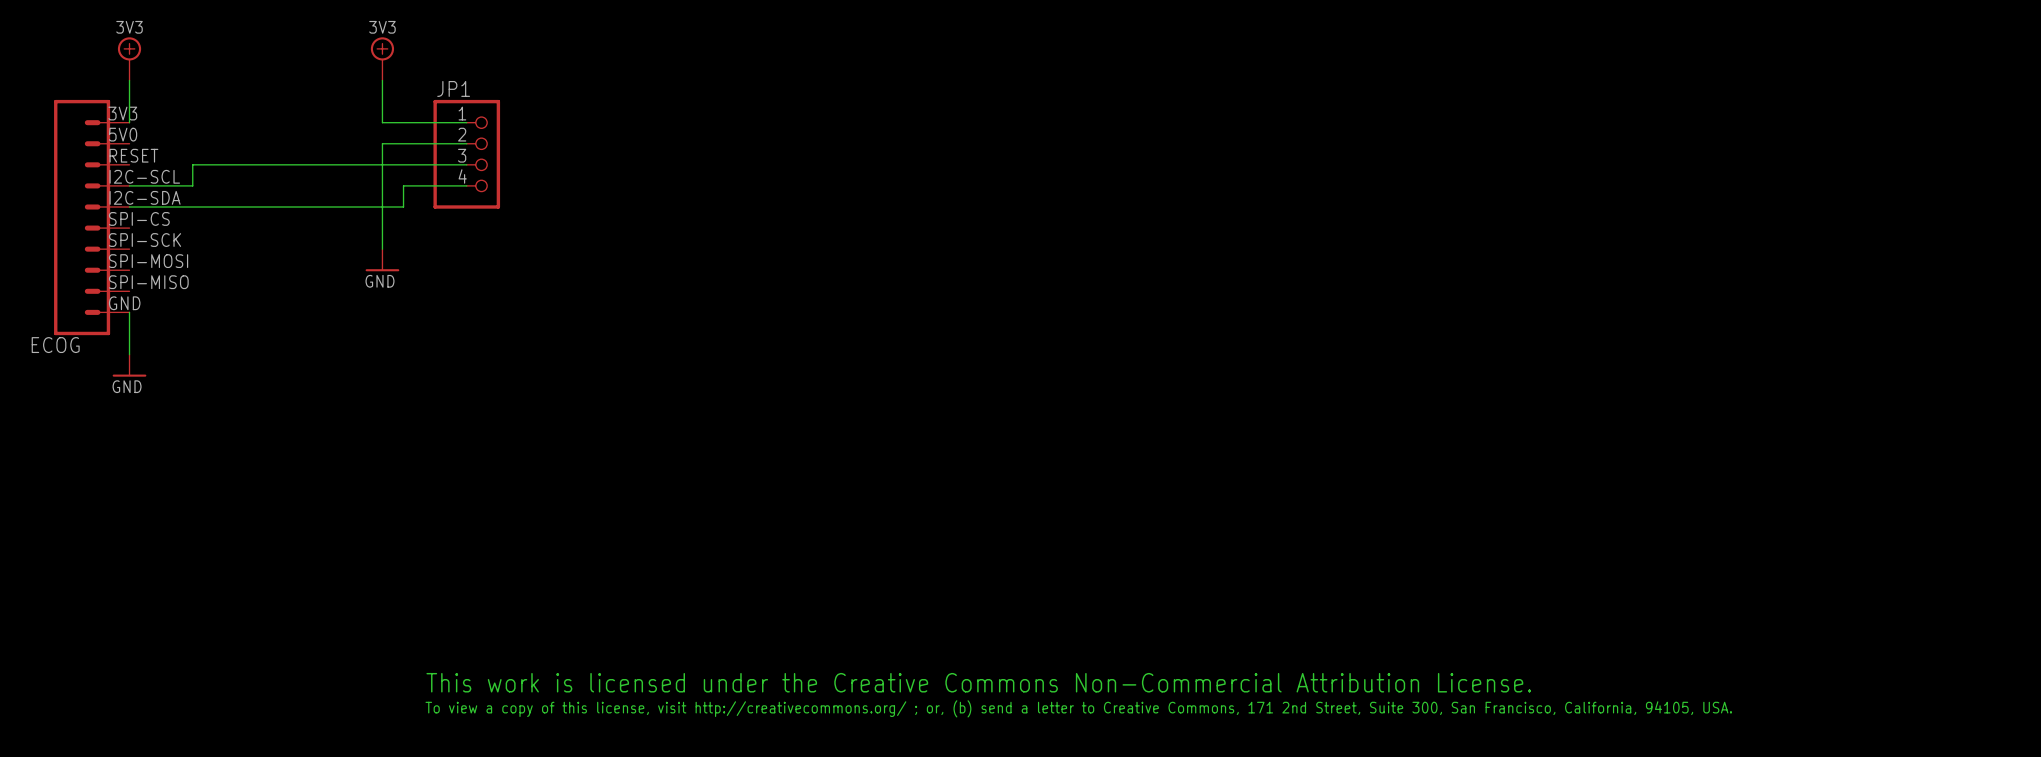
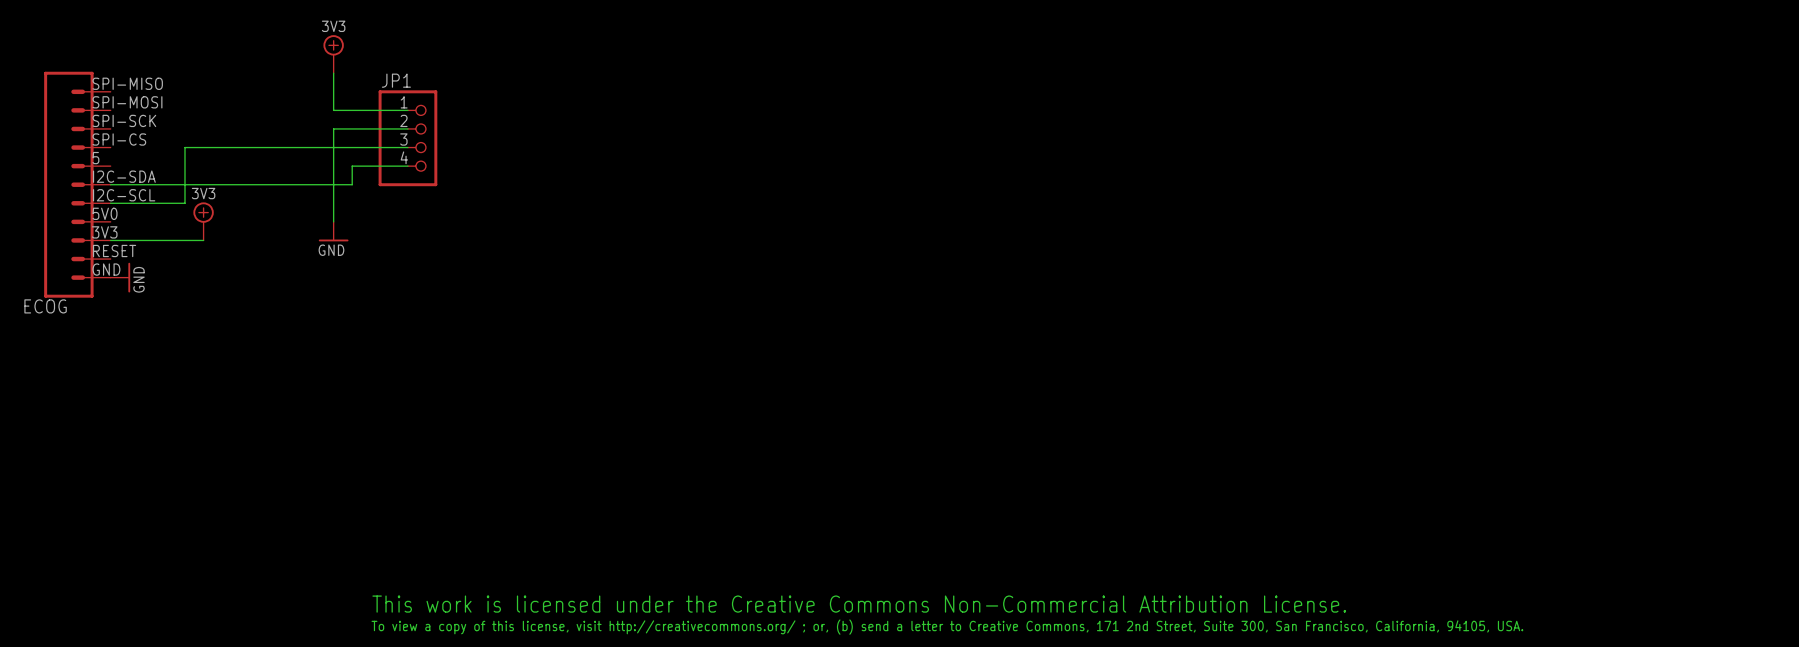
power symbol: 3V3 (129, 58) -> none
wire: (129, 80) (129, 122) -> none
wire: (213, 164) (192, 164) (192, 185) (129, 185) -> (184, 147) (184, 203) (110, 203)
ECOG: none -> (77, 184)
ECOG: (91, 217) -> none
power symbol: none -> 3V3 (203, 221)
wire: none -> (110, 240) (203, 240)
wire: (129, 312) (129, 354) -> none
power symbol position: GND (129, 365) -> GND (120, 277)
power symbol rotation: 0° (129, 375) -> 90° counterclockwise (129, 277)

